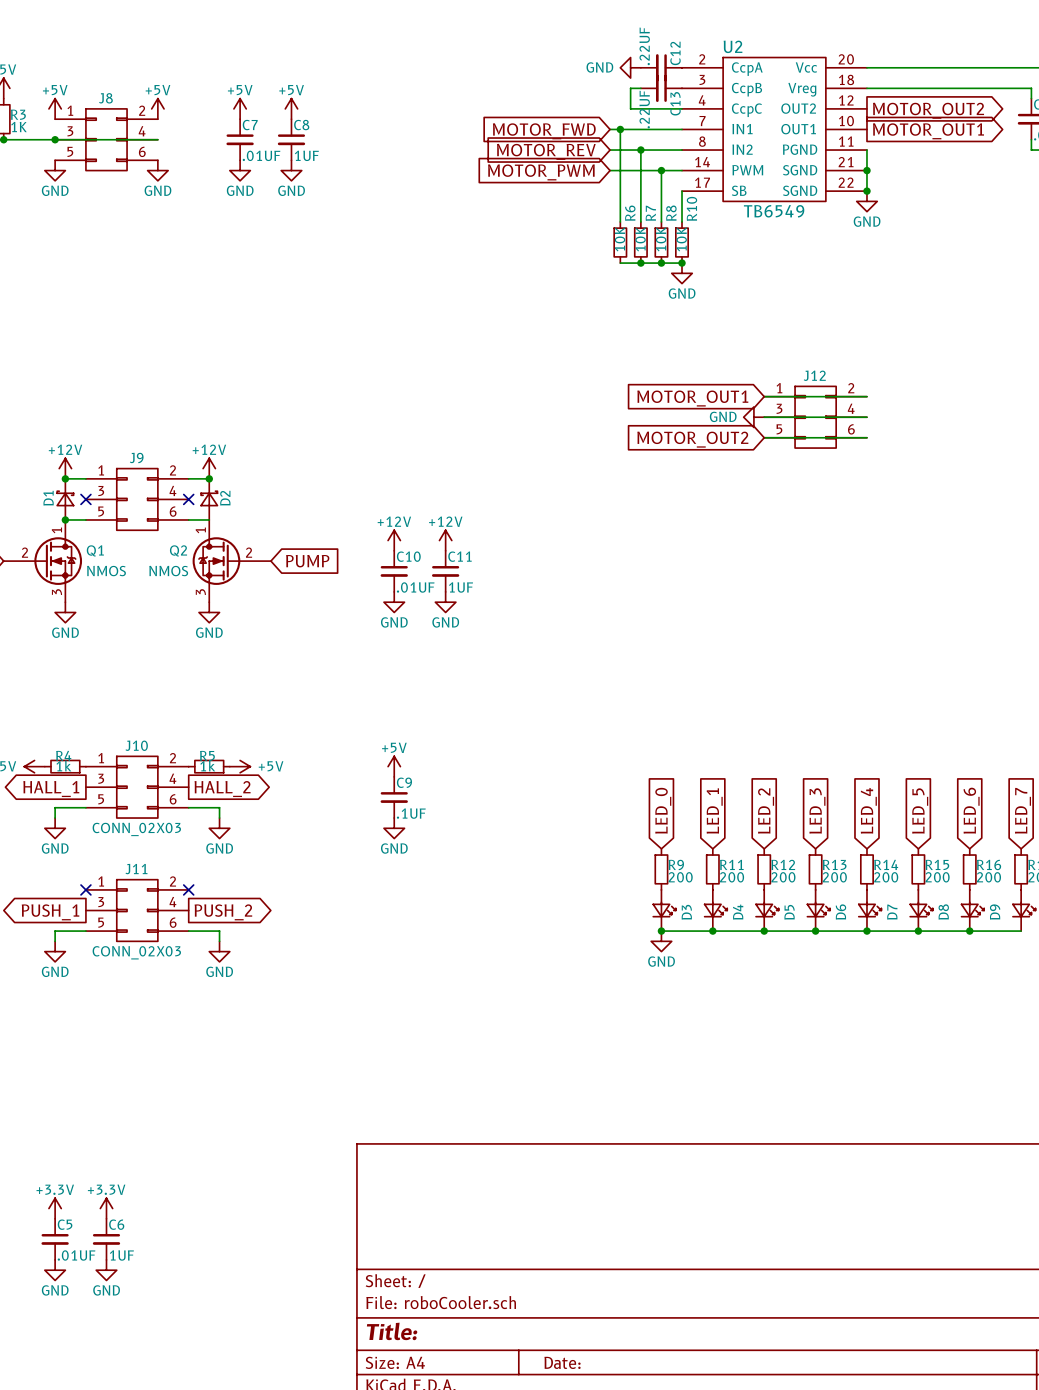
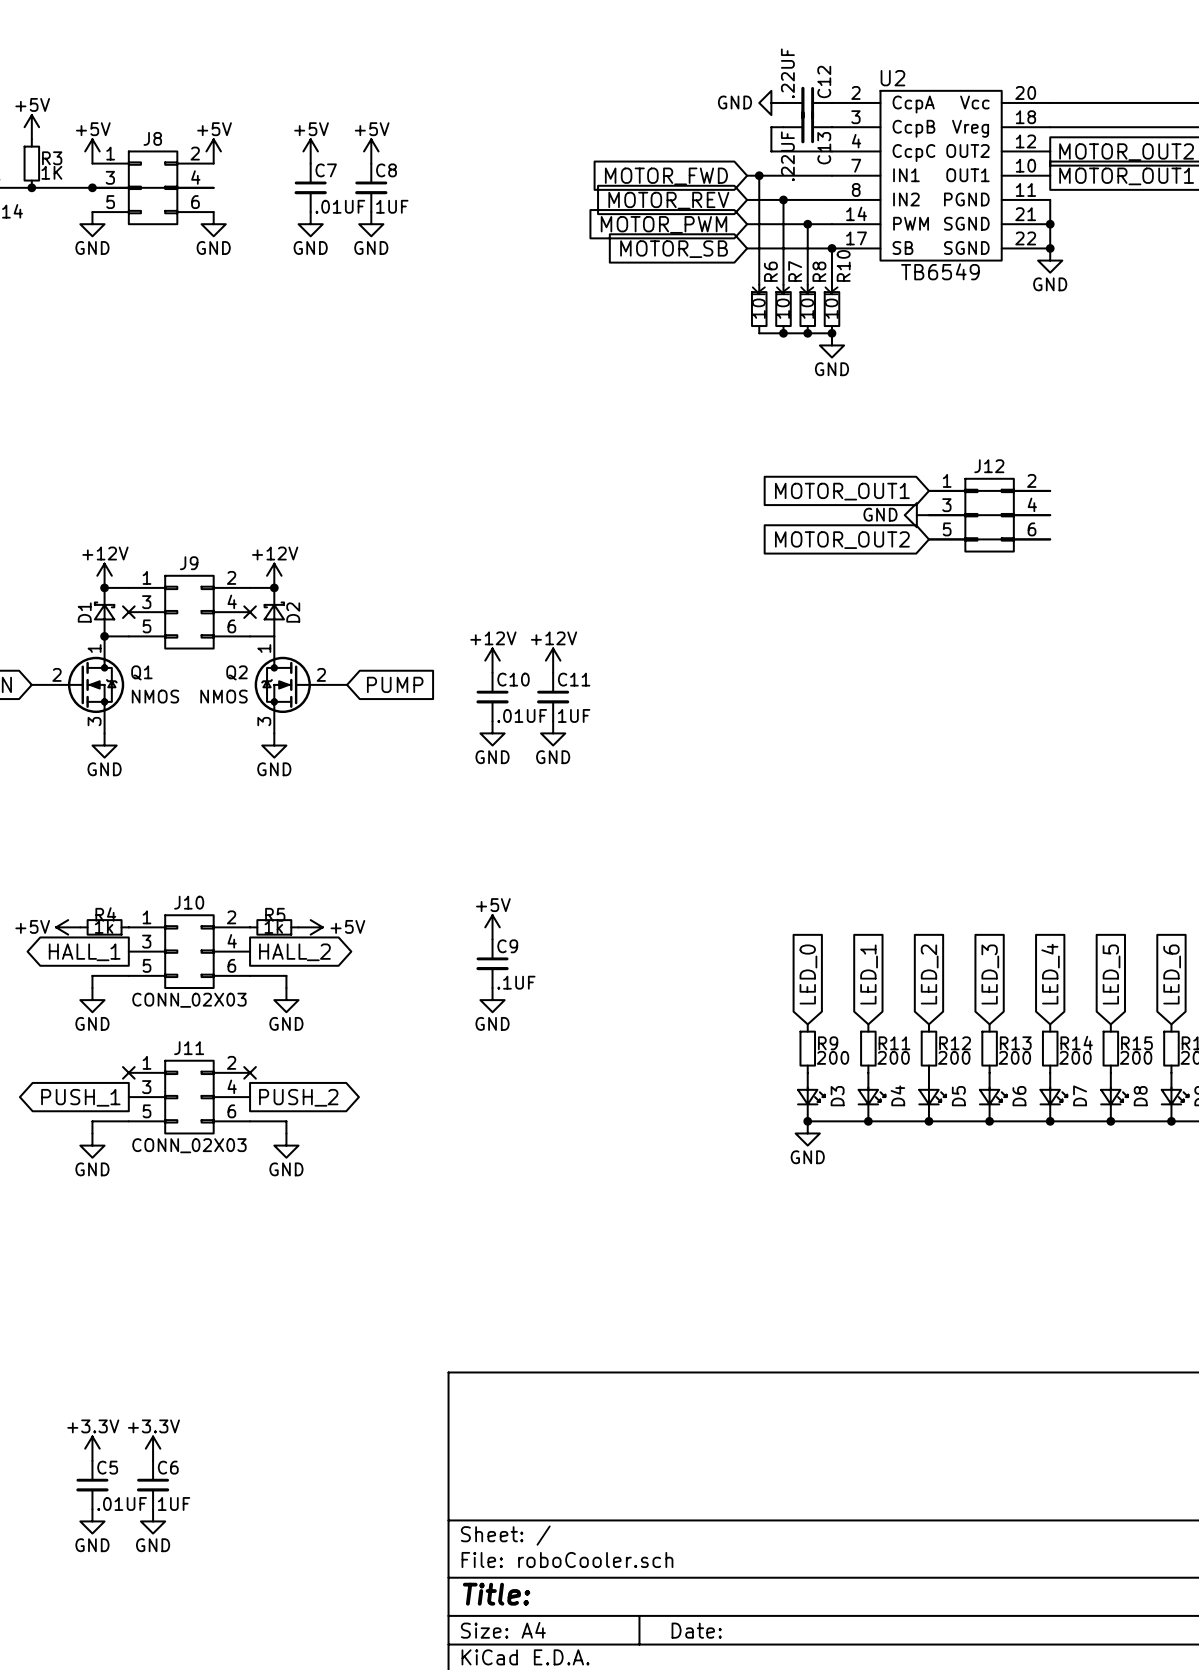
wire: none -> (747, 248) (831, 248)
junction: none -> (831, 248)
global label: none -> MOTOR_SB (674, 249)

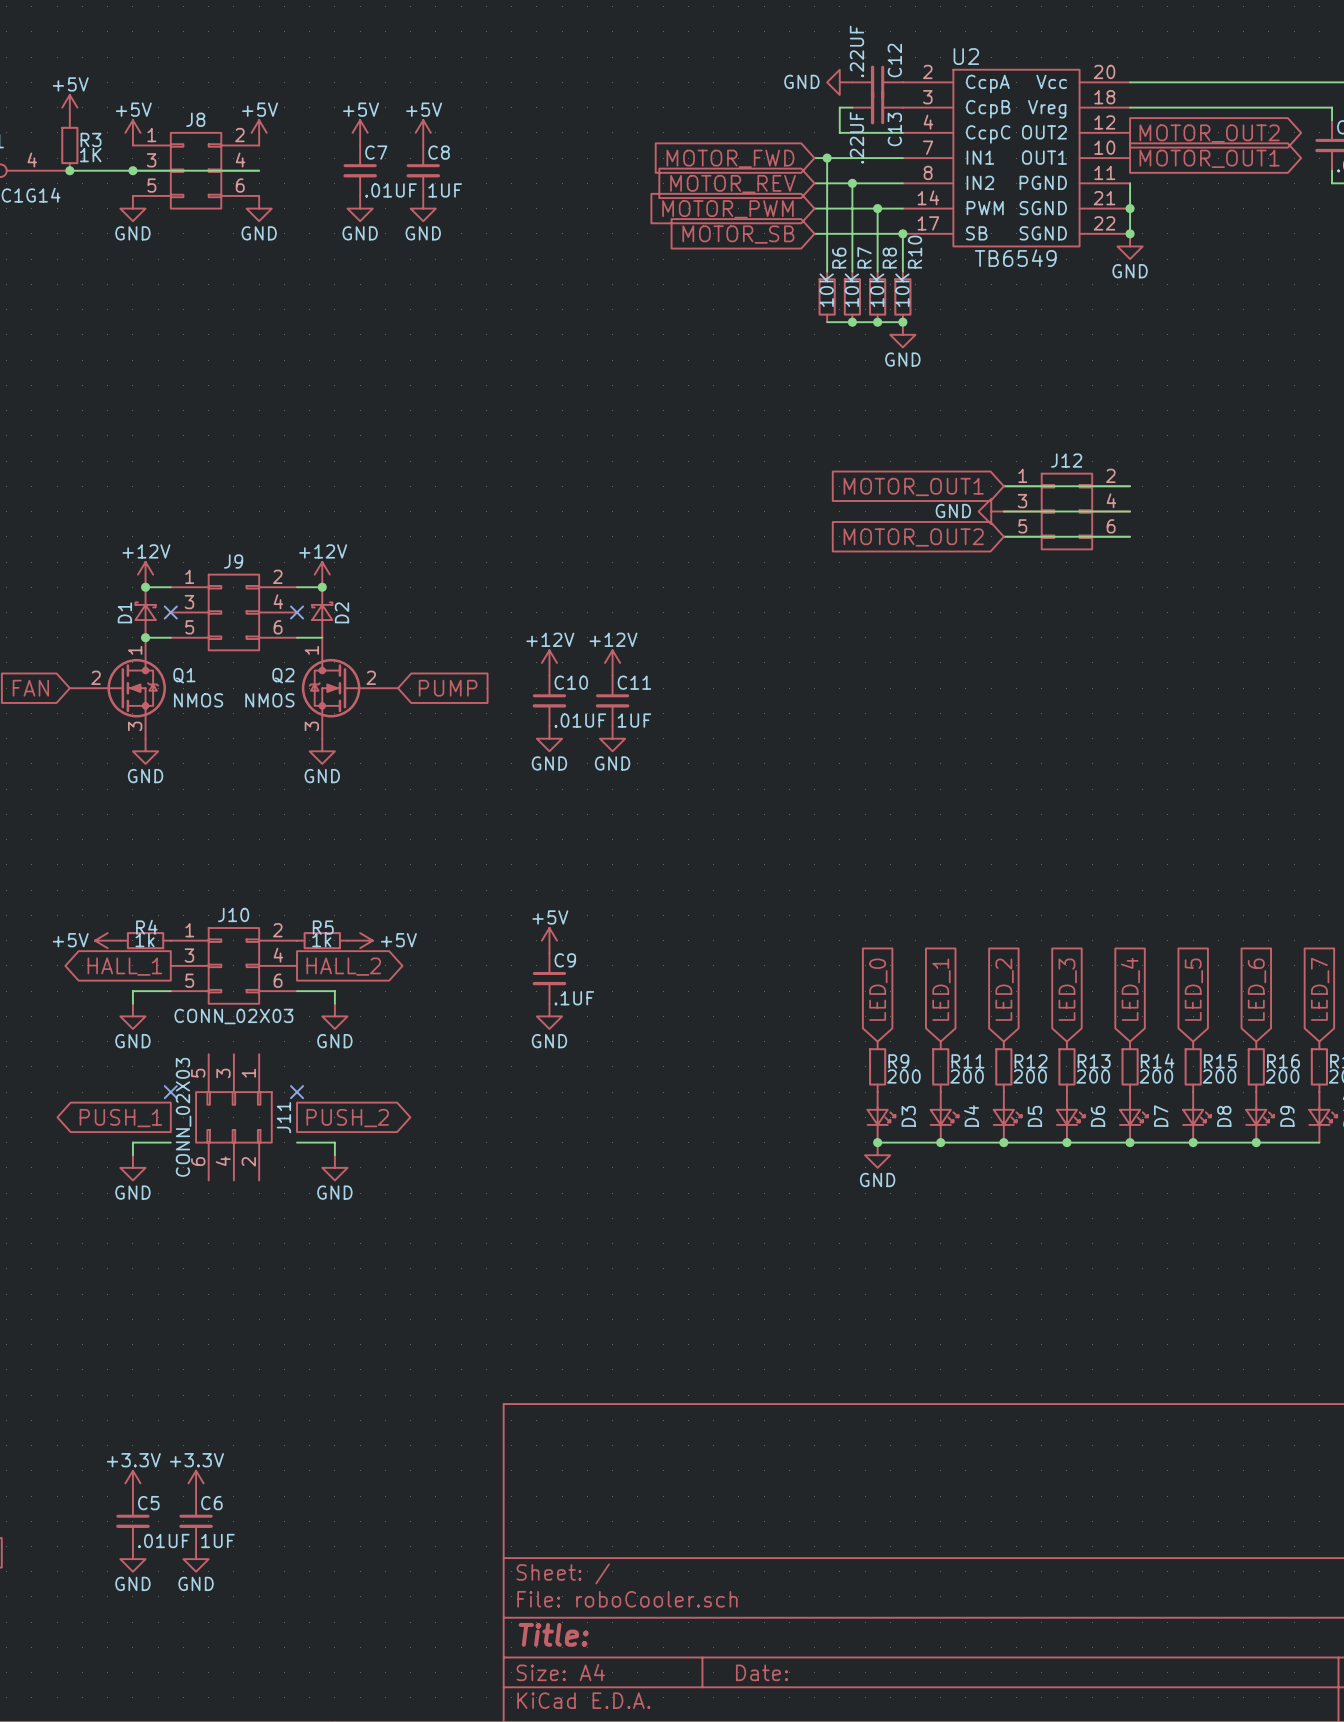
J11 rotation: 0° (189, 1097) -> 90° clockwise (233, 1117)

